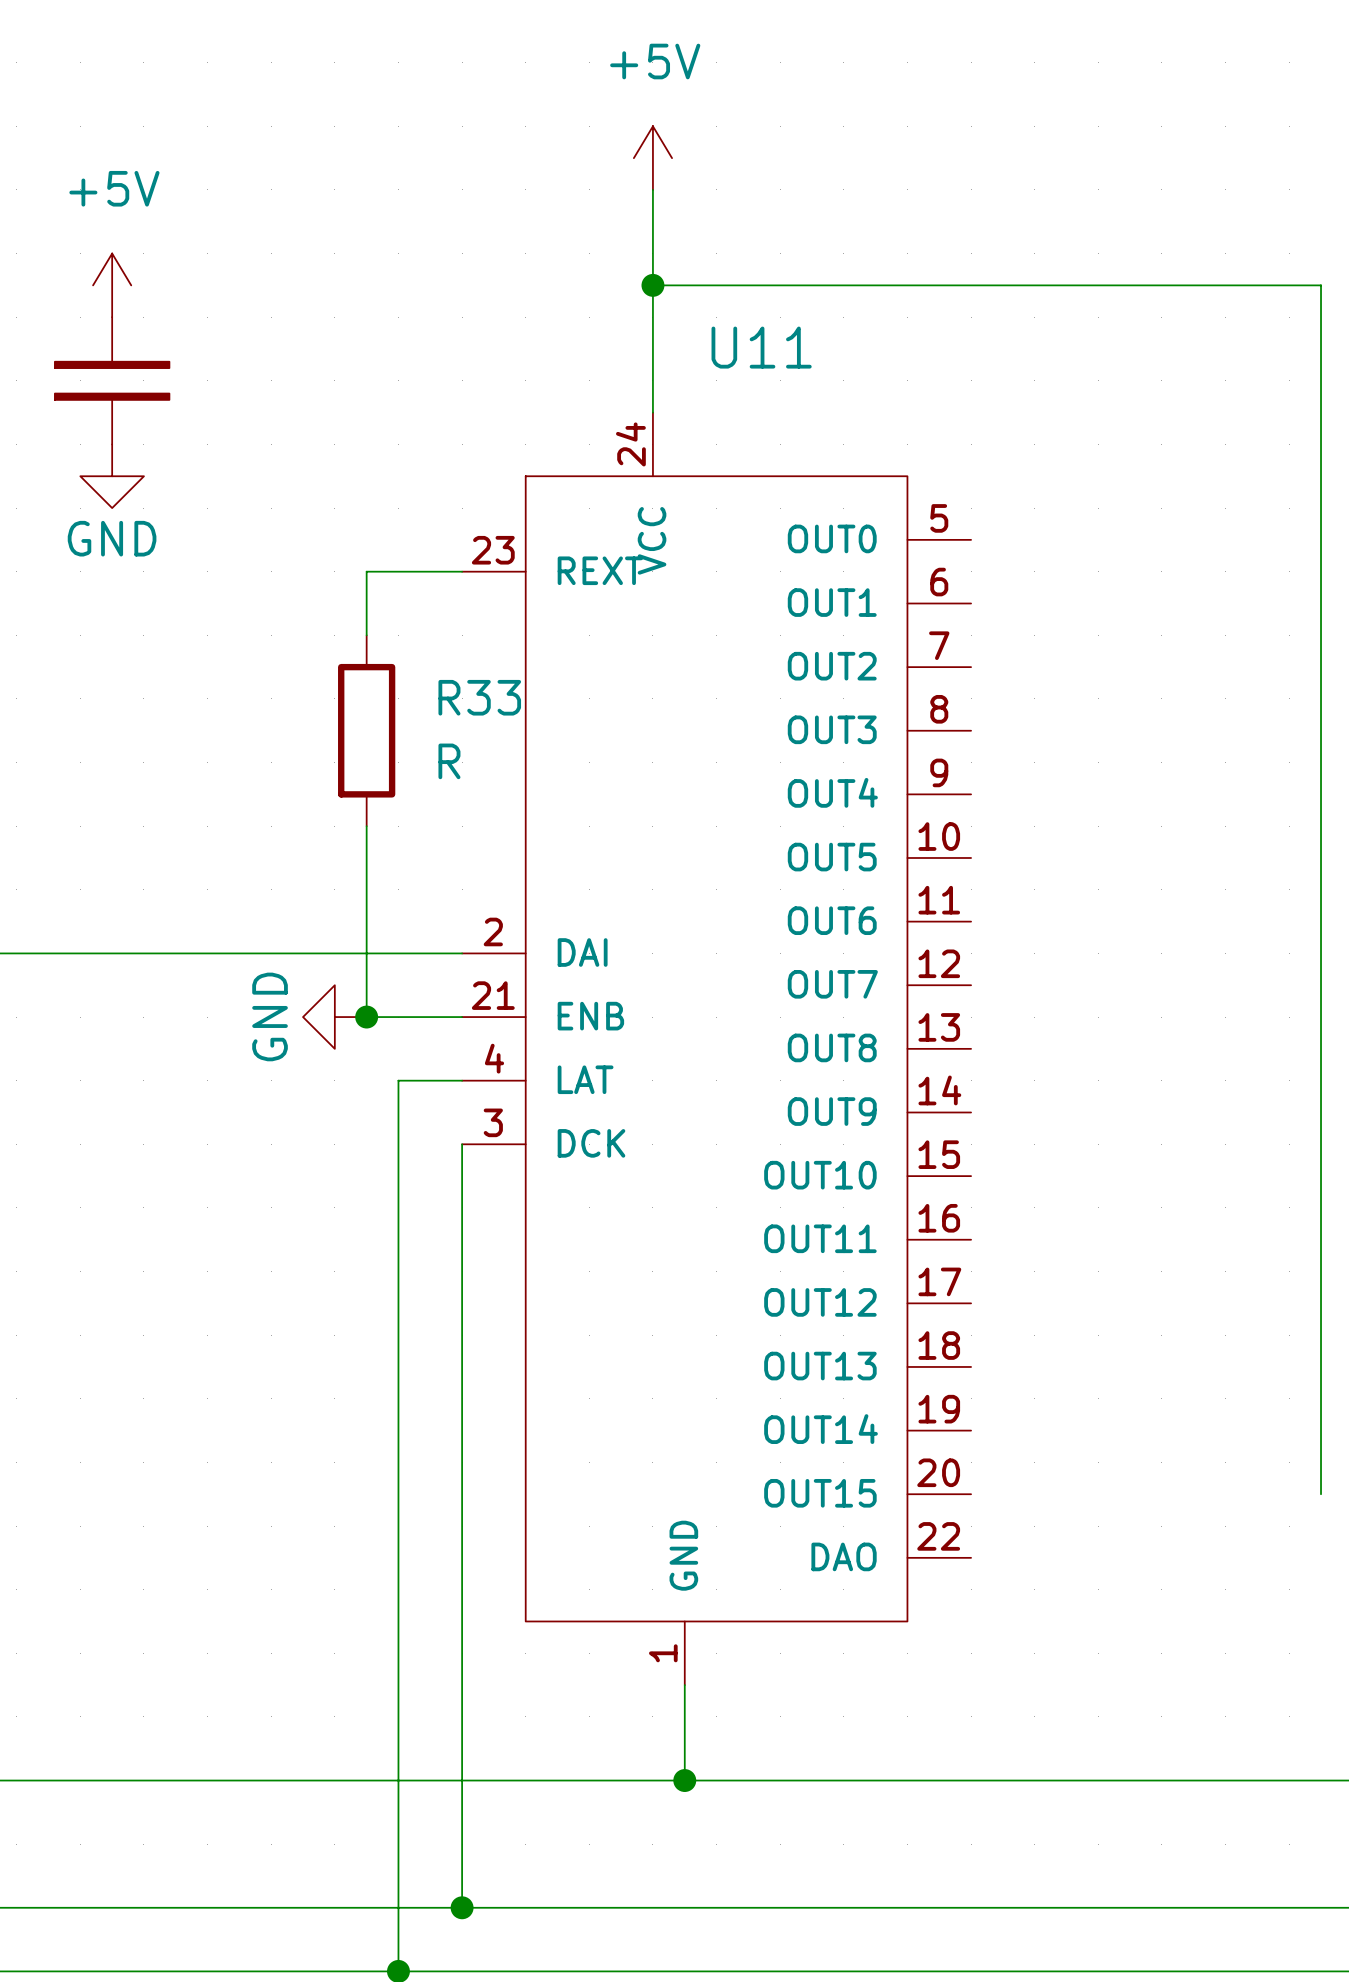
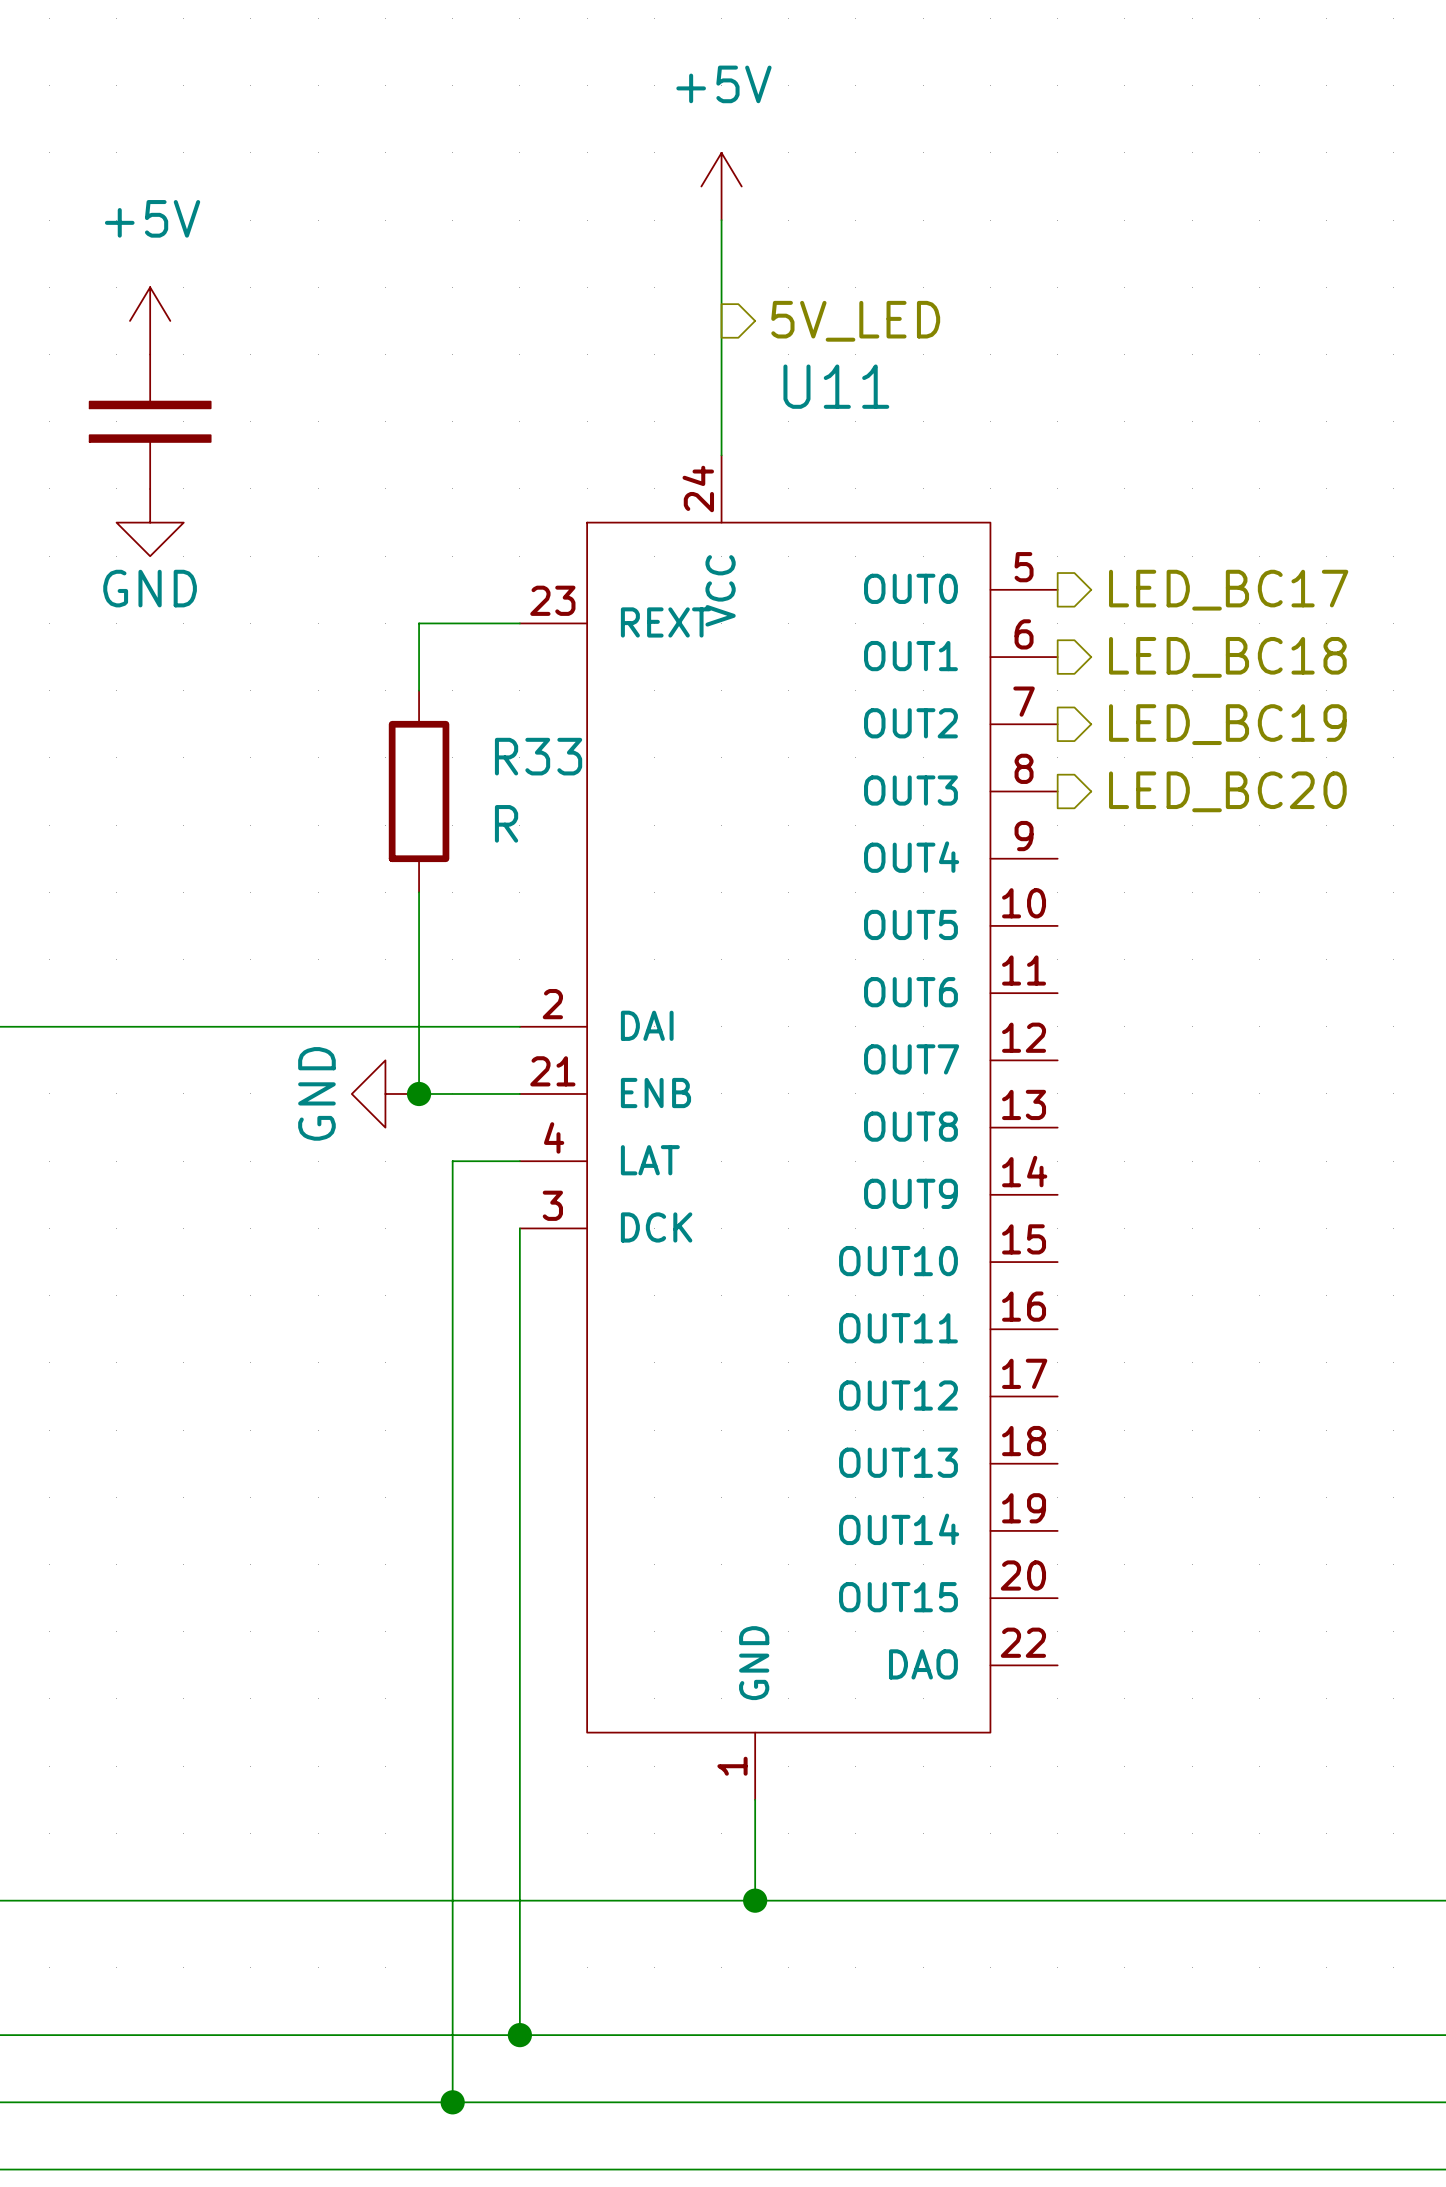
wire: (652, 285) (1321, 285) (1321, 1494) -> none
junction: (652, 285) -> none
hierarchical label: none -> 5V_LED (855, 321)
hierarchical label: none -> LED_BC17 (1228, 590)
hierarchical label: none -> LED_BC18 (1227, 657)
hierarchical label: none -> LED_BC19 (1227, 724)
hierarchical label: none -> LED_BC20 (1227, 791)

